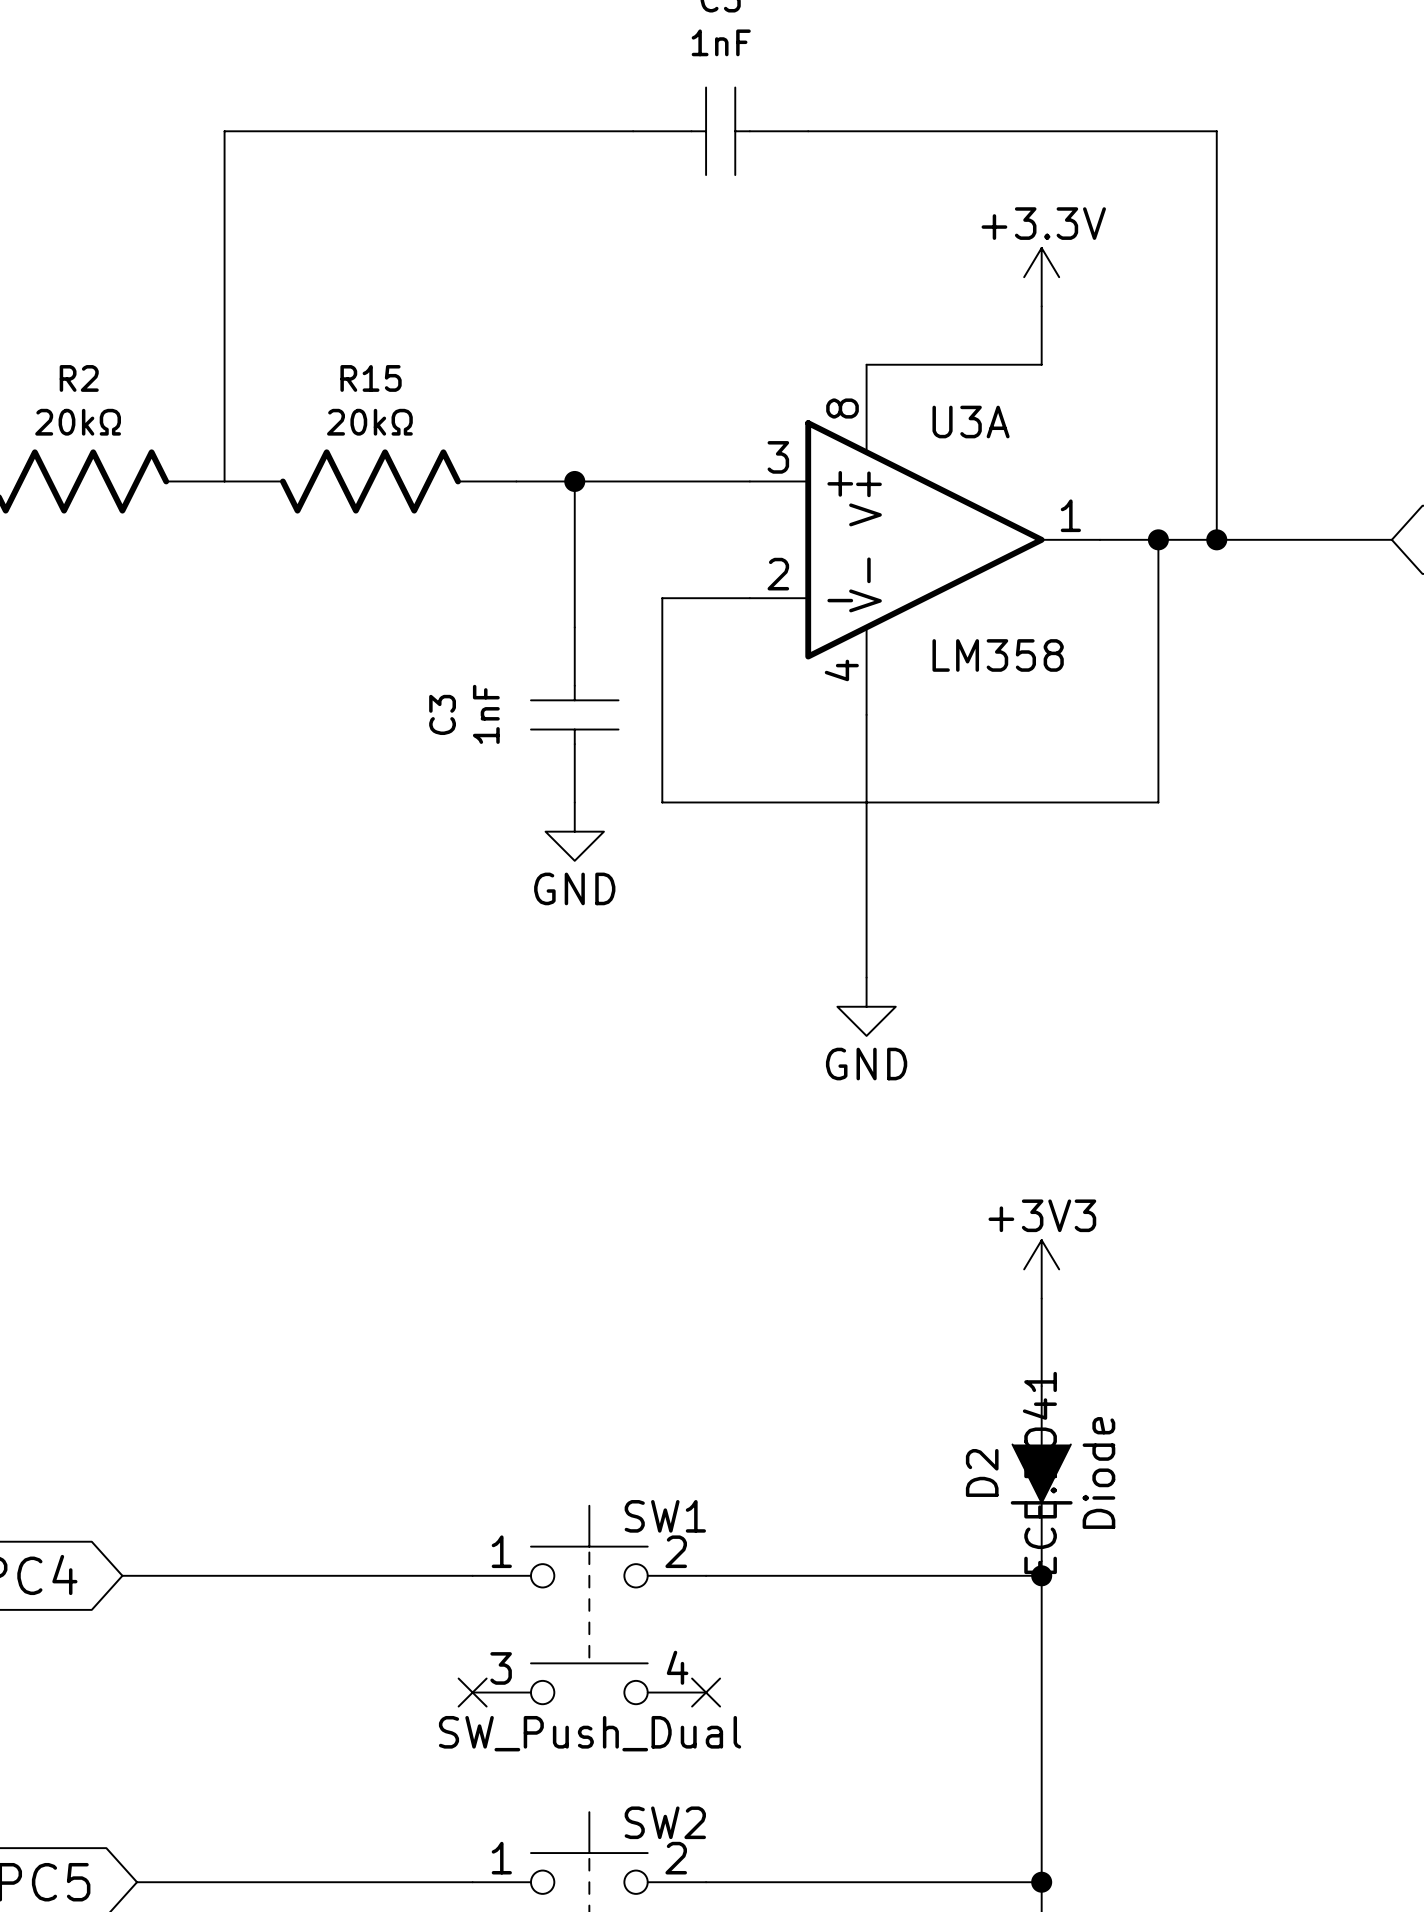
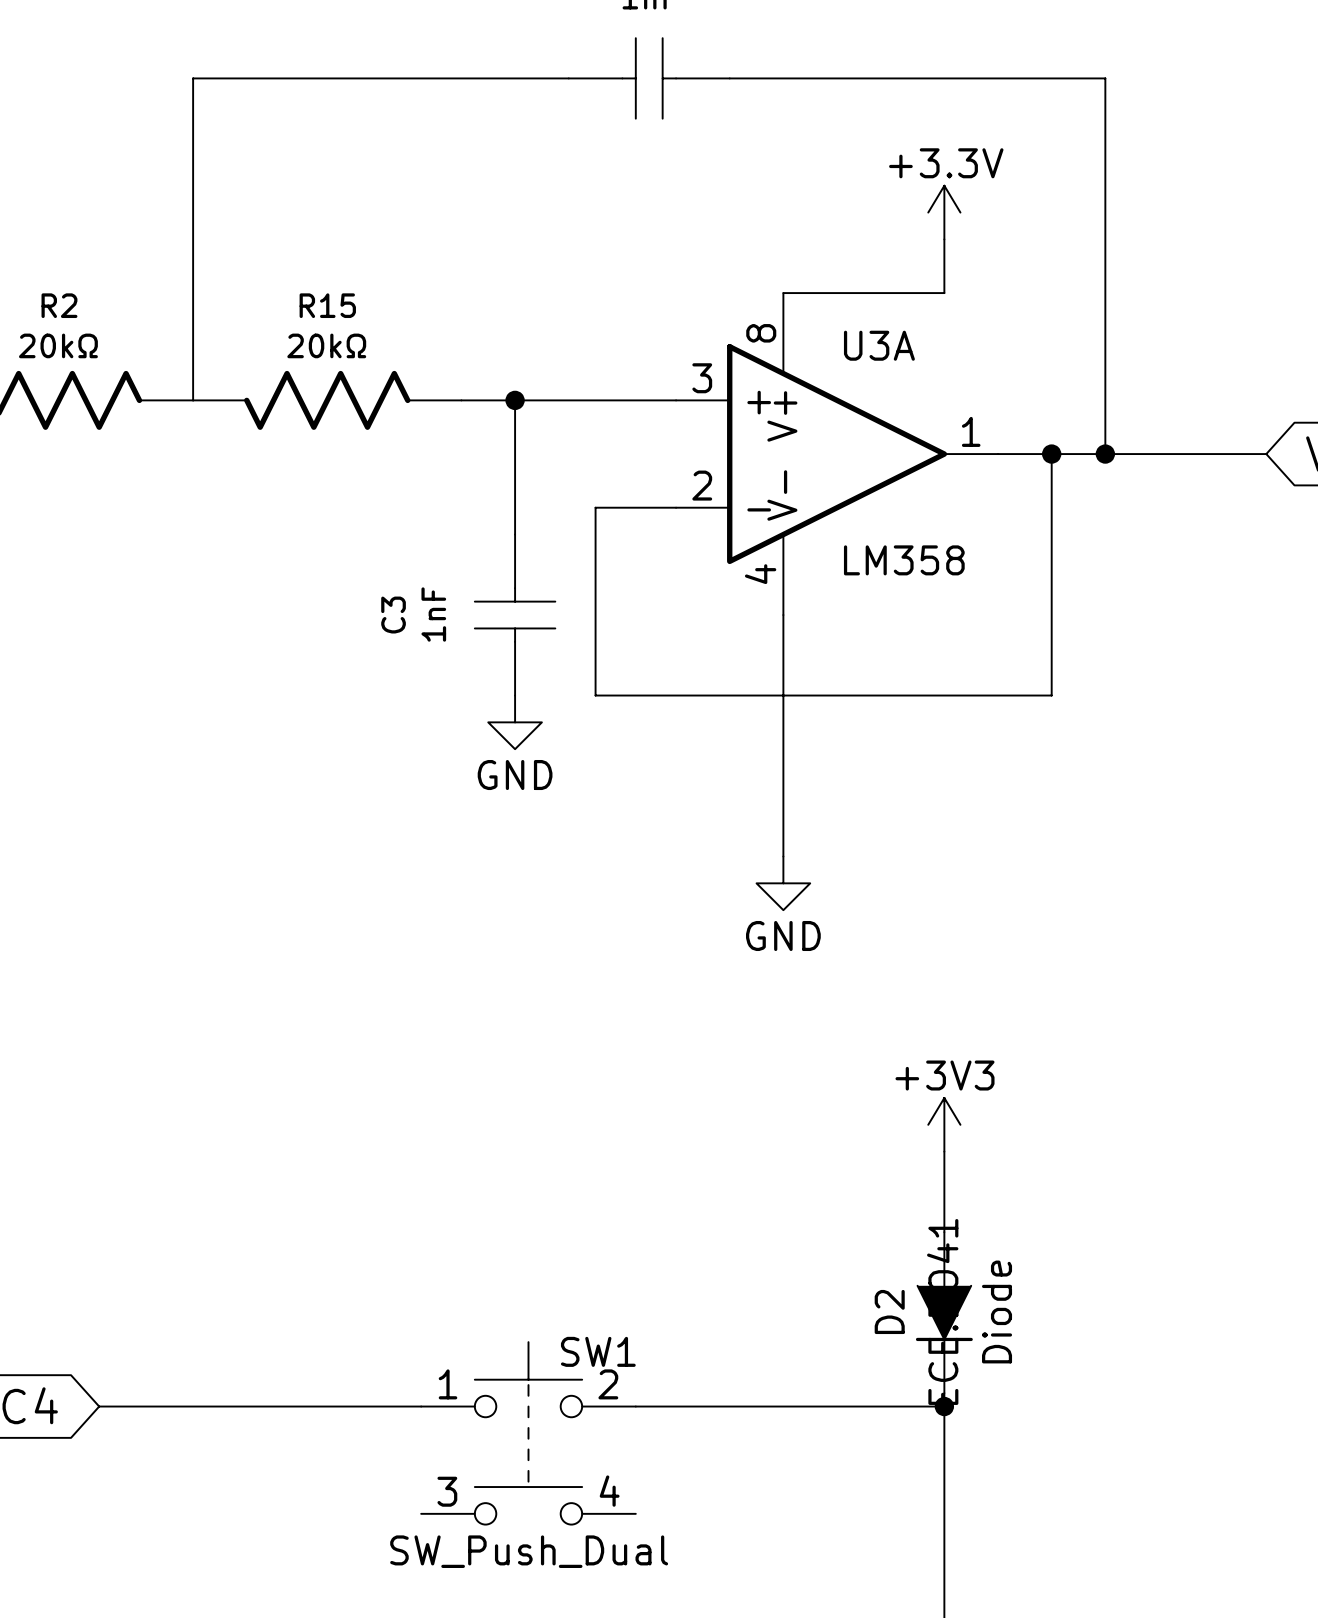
no-connect mark: (472, 1692) -> none
no-connect mark: (706, 1692) -> none

